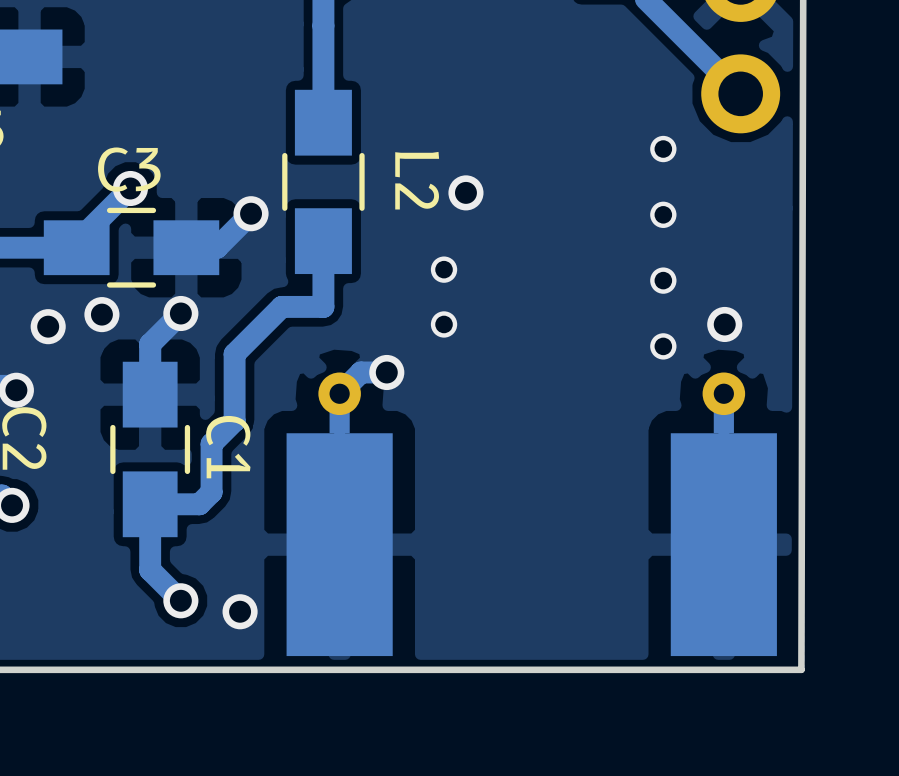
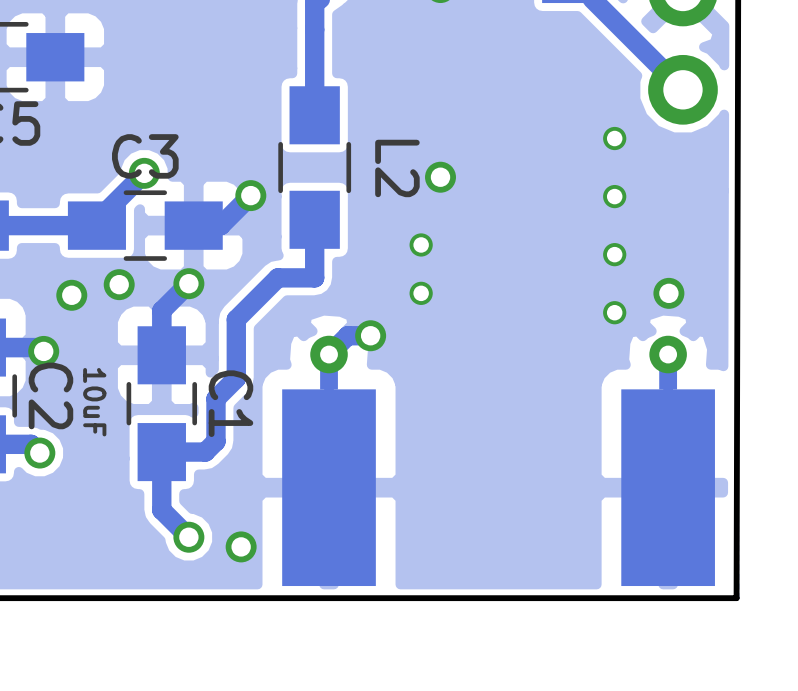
text: none -> 10uF (94, 402)

